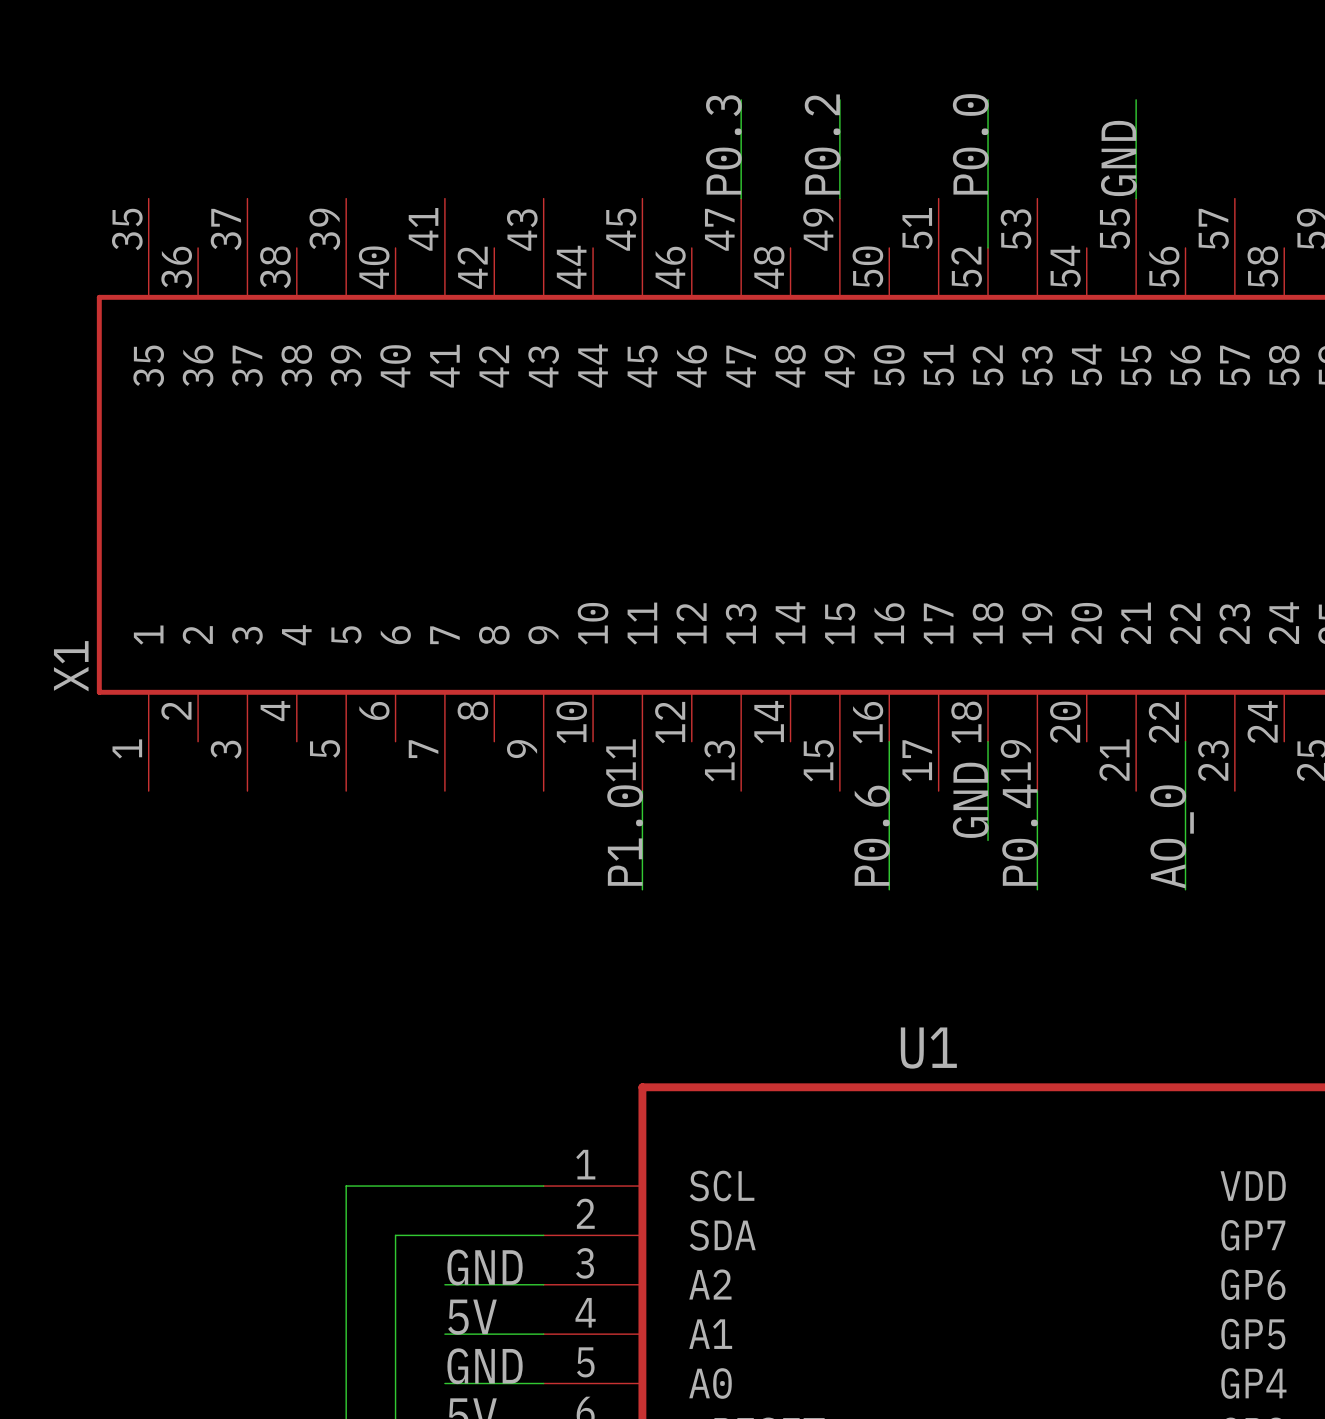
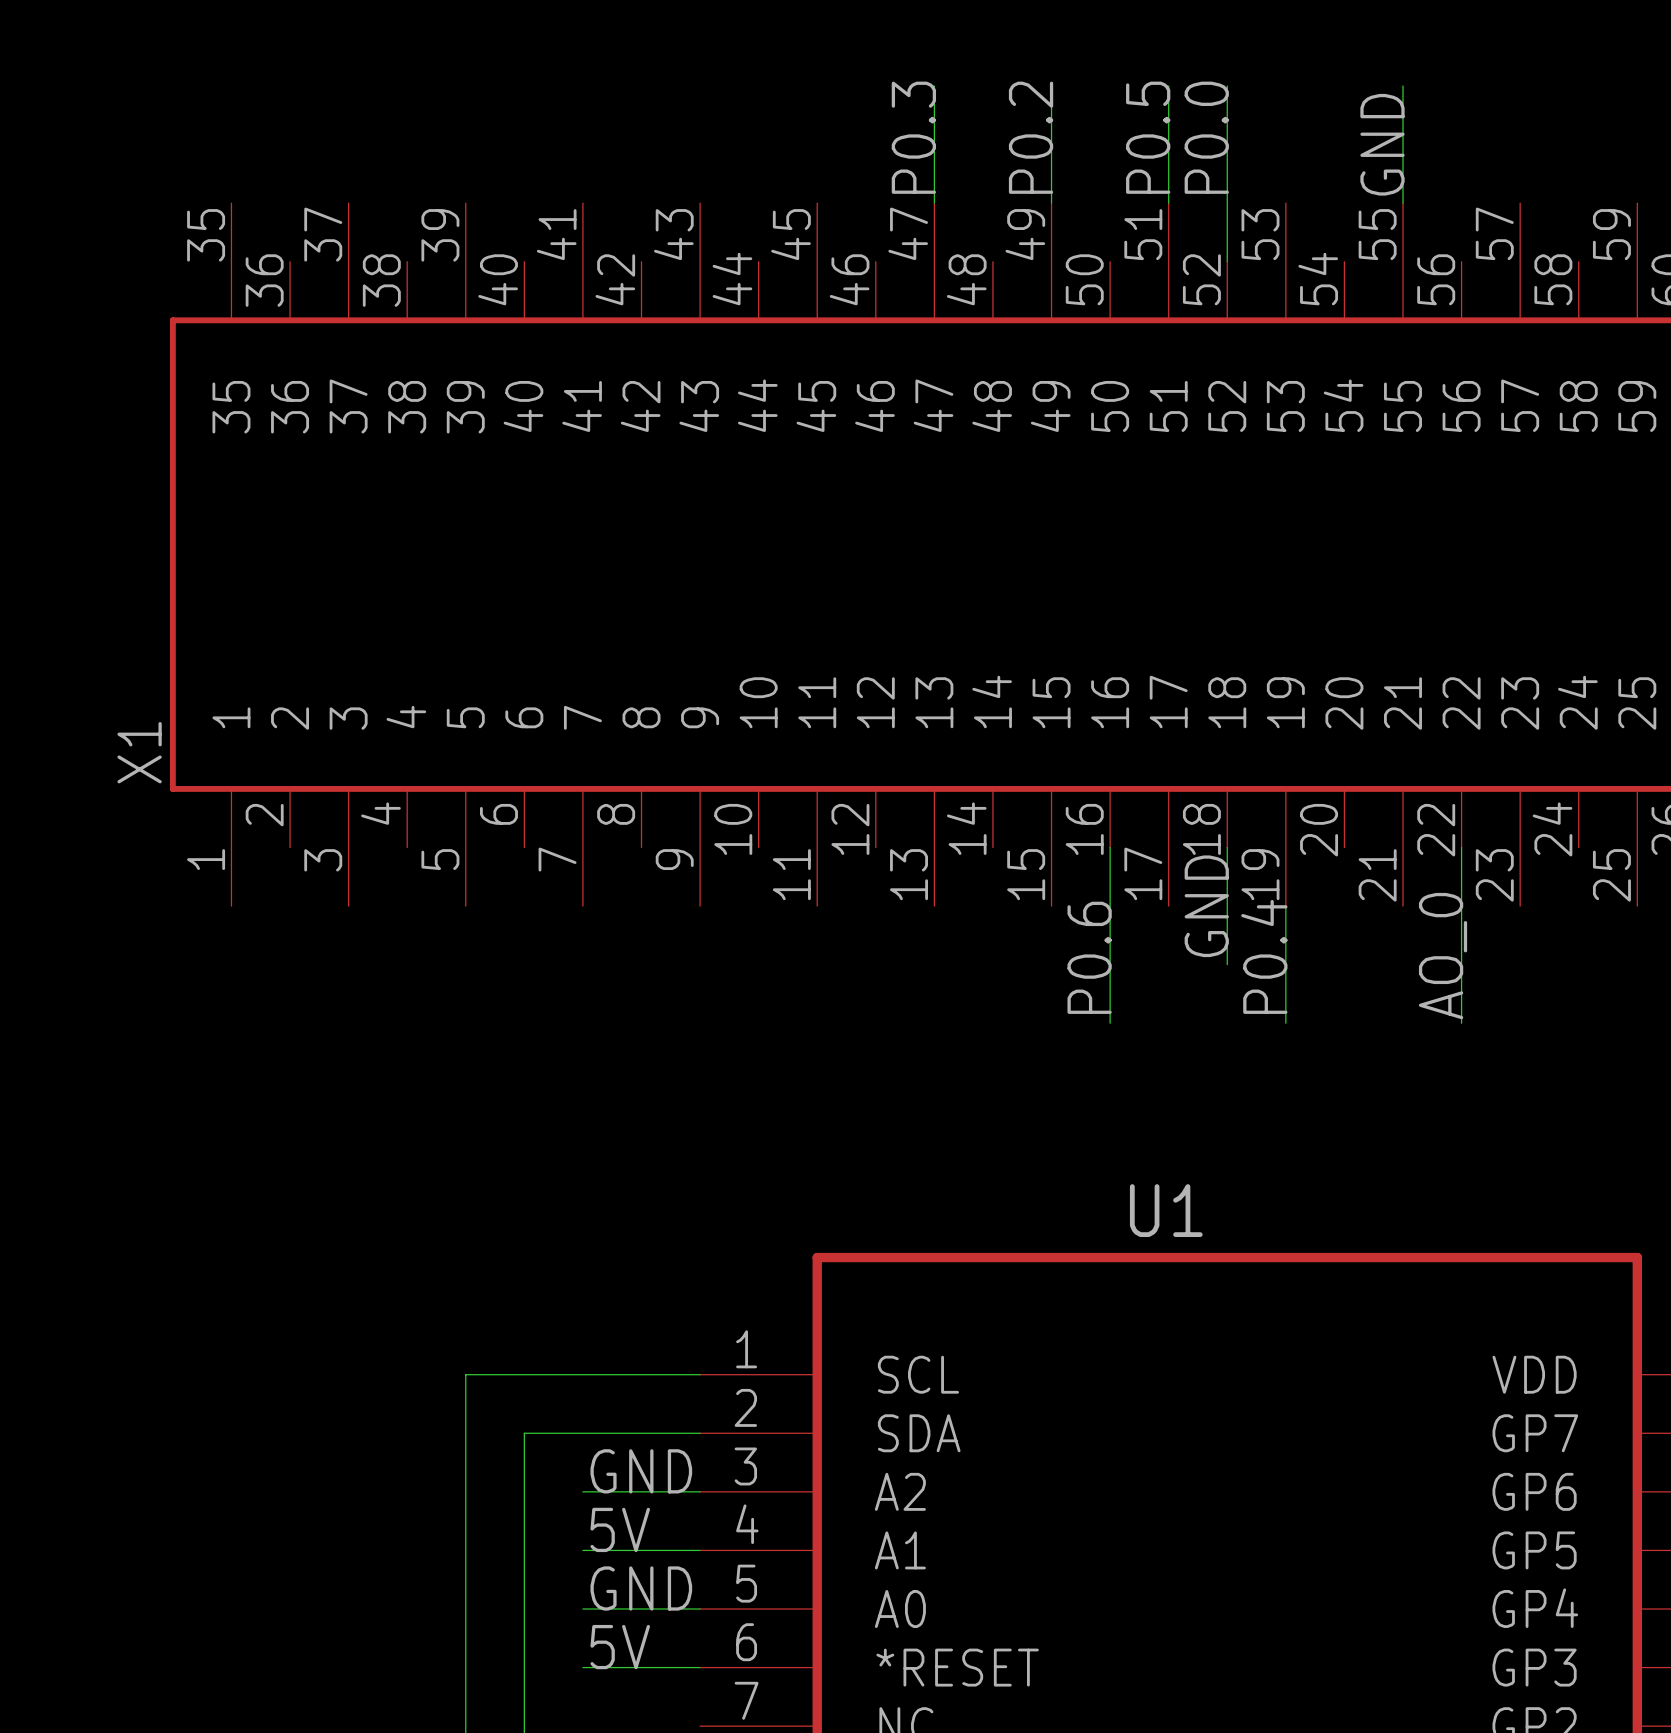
wire: none -> (1168, 86) (1168, 203)
label: none -> P0.5 (1148, 137)
wire: (642, 791) (642, 889) -> none
label: P1.0 (625, 835) -> none

